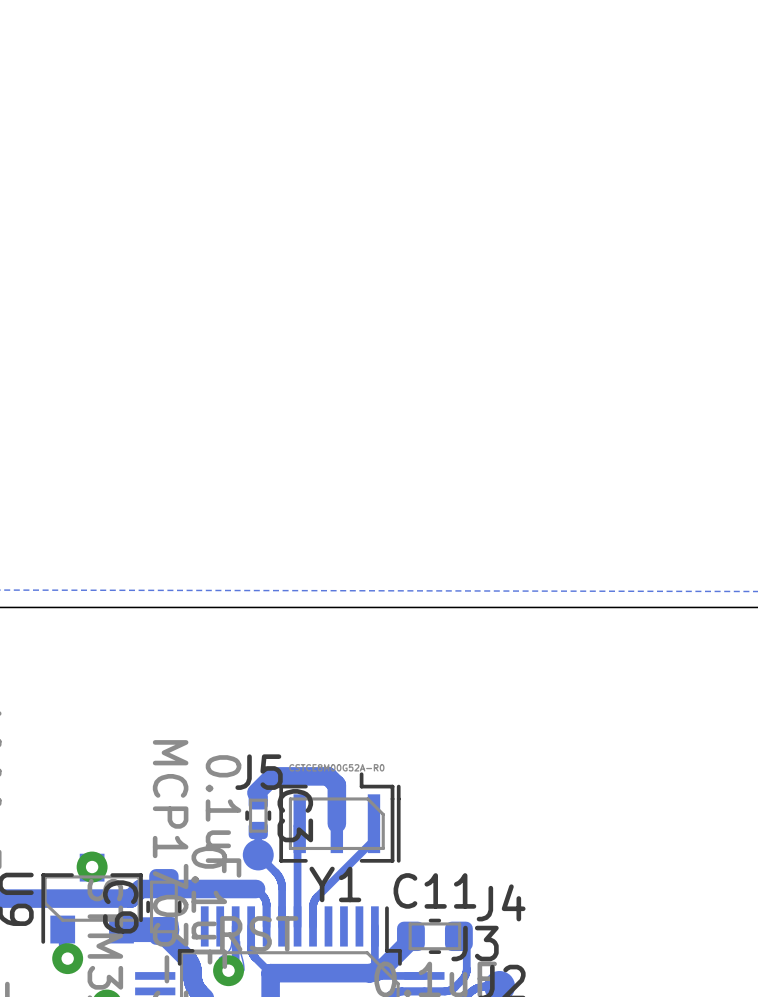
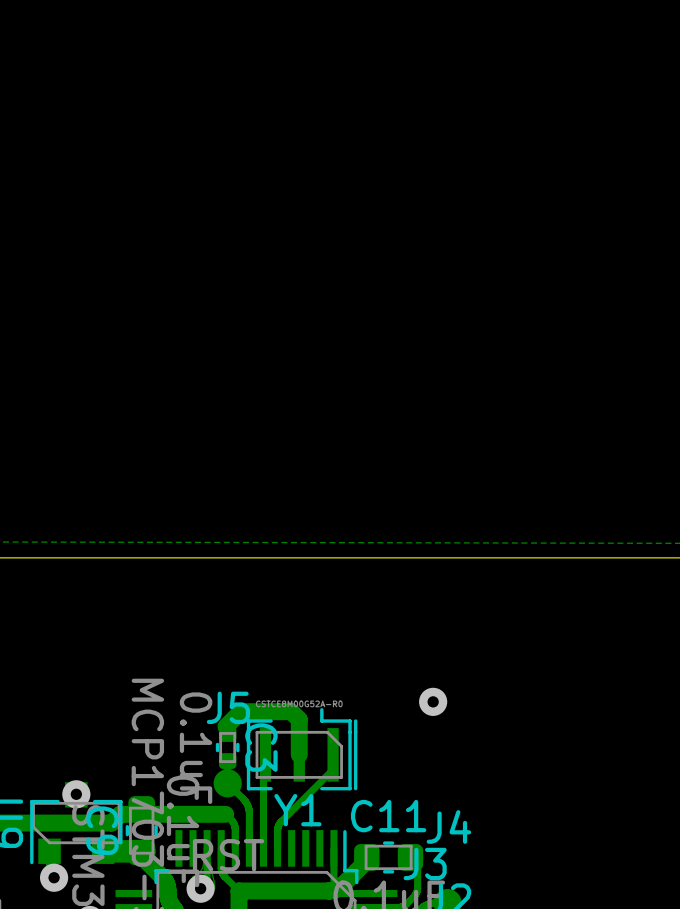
via: none -> (433, 701)

